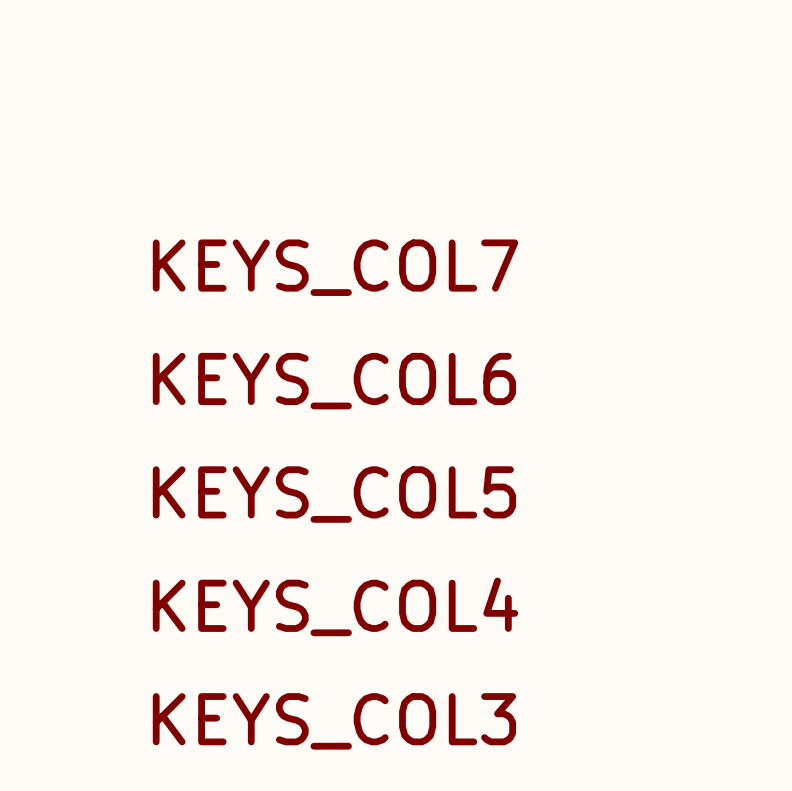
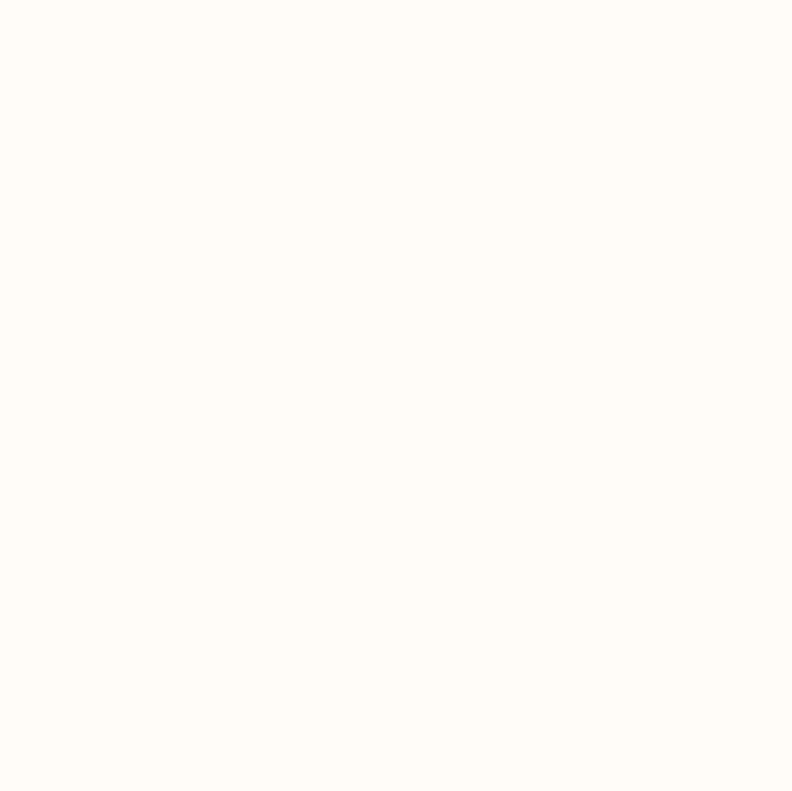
label: KEYS_COL7 (335, 267) -> none
label: KEYS_COL6 (334, 381) -> none
label: KEYS_COL5 (334, 494) -> none
label: KEYS_COL4 (335, 606) -> none
label: KEYS_COL3 (334, 721) -> none

